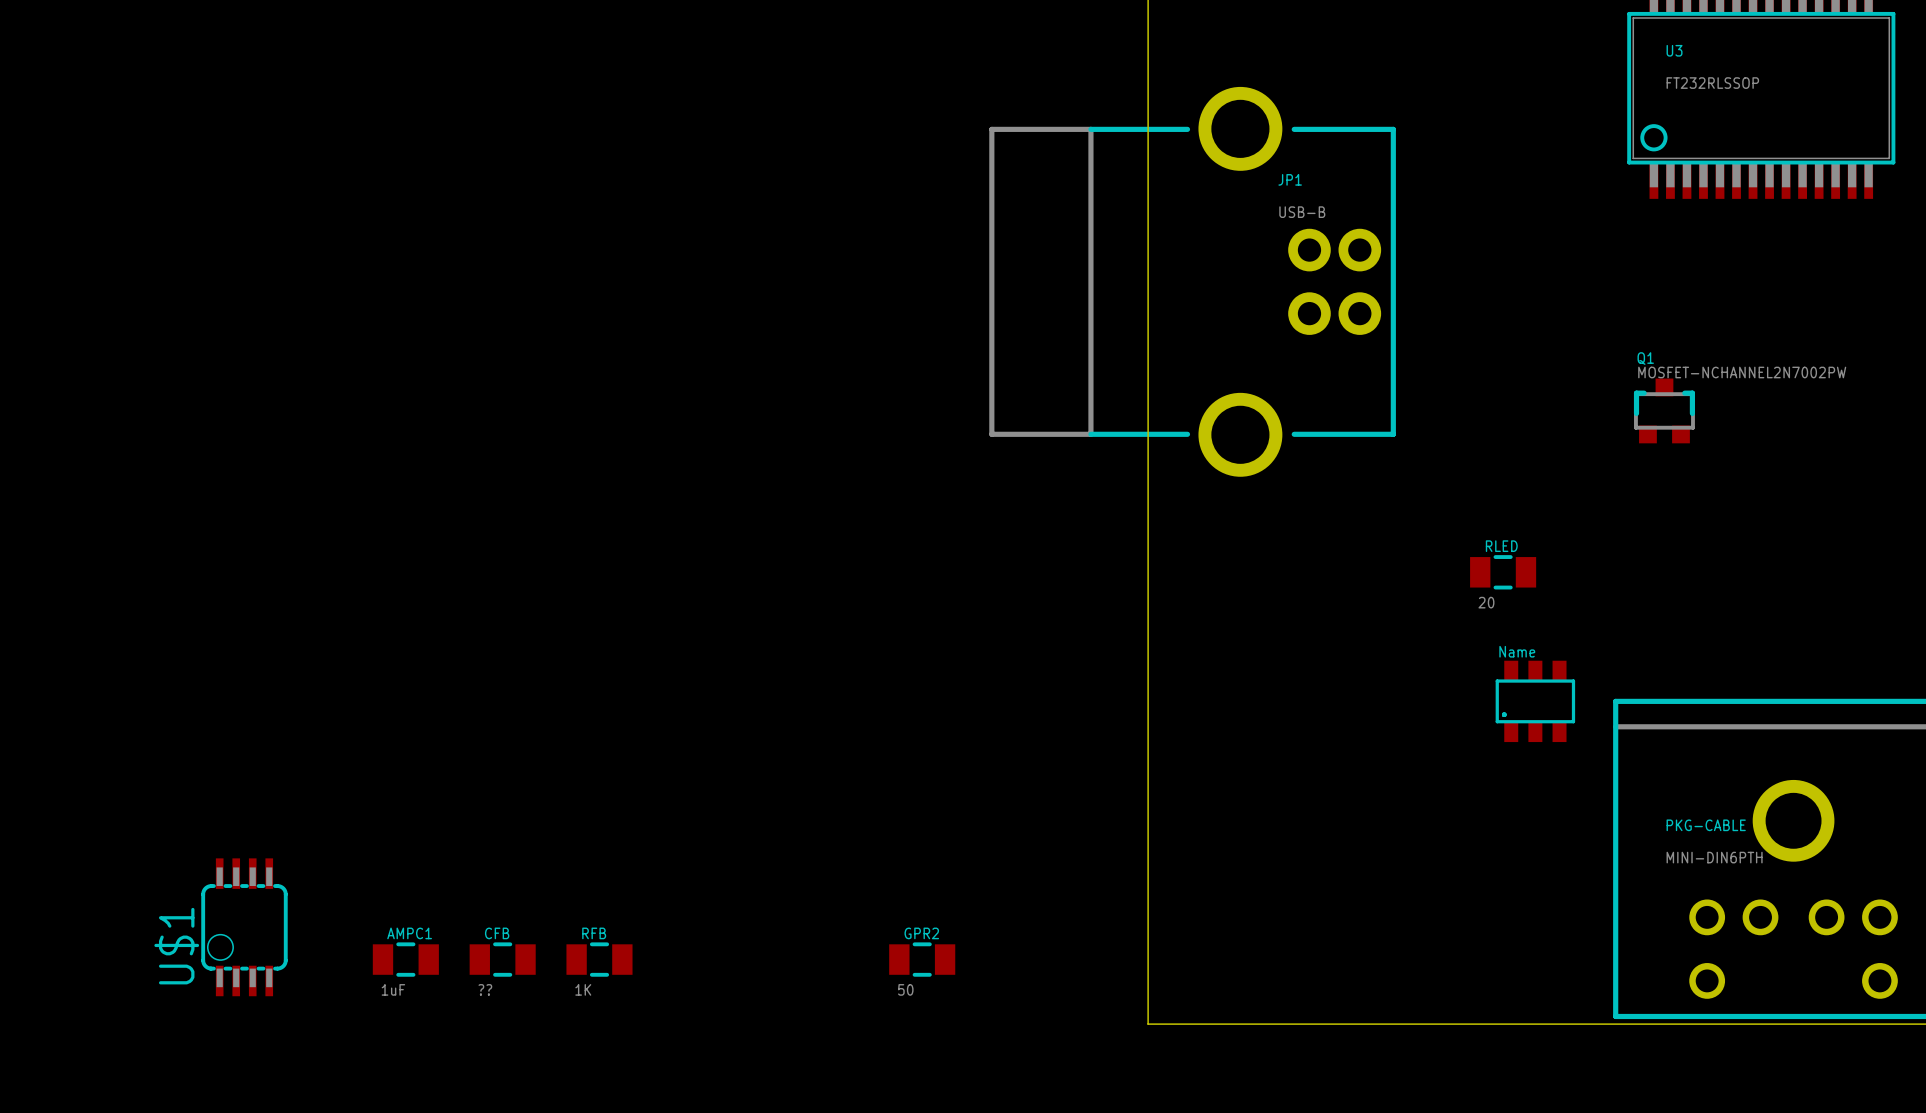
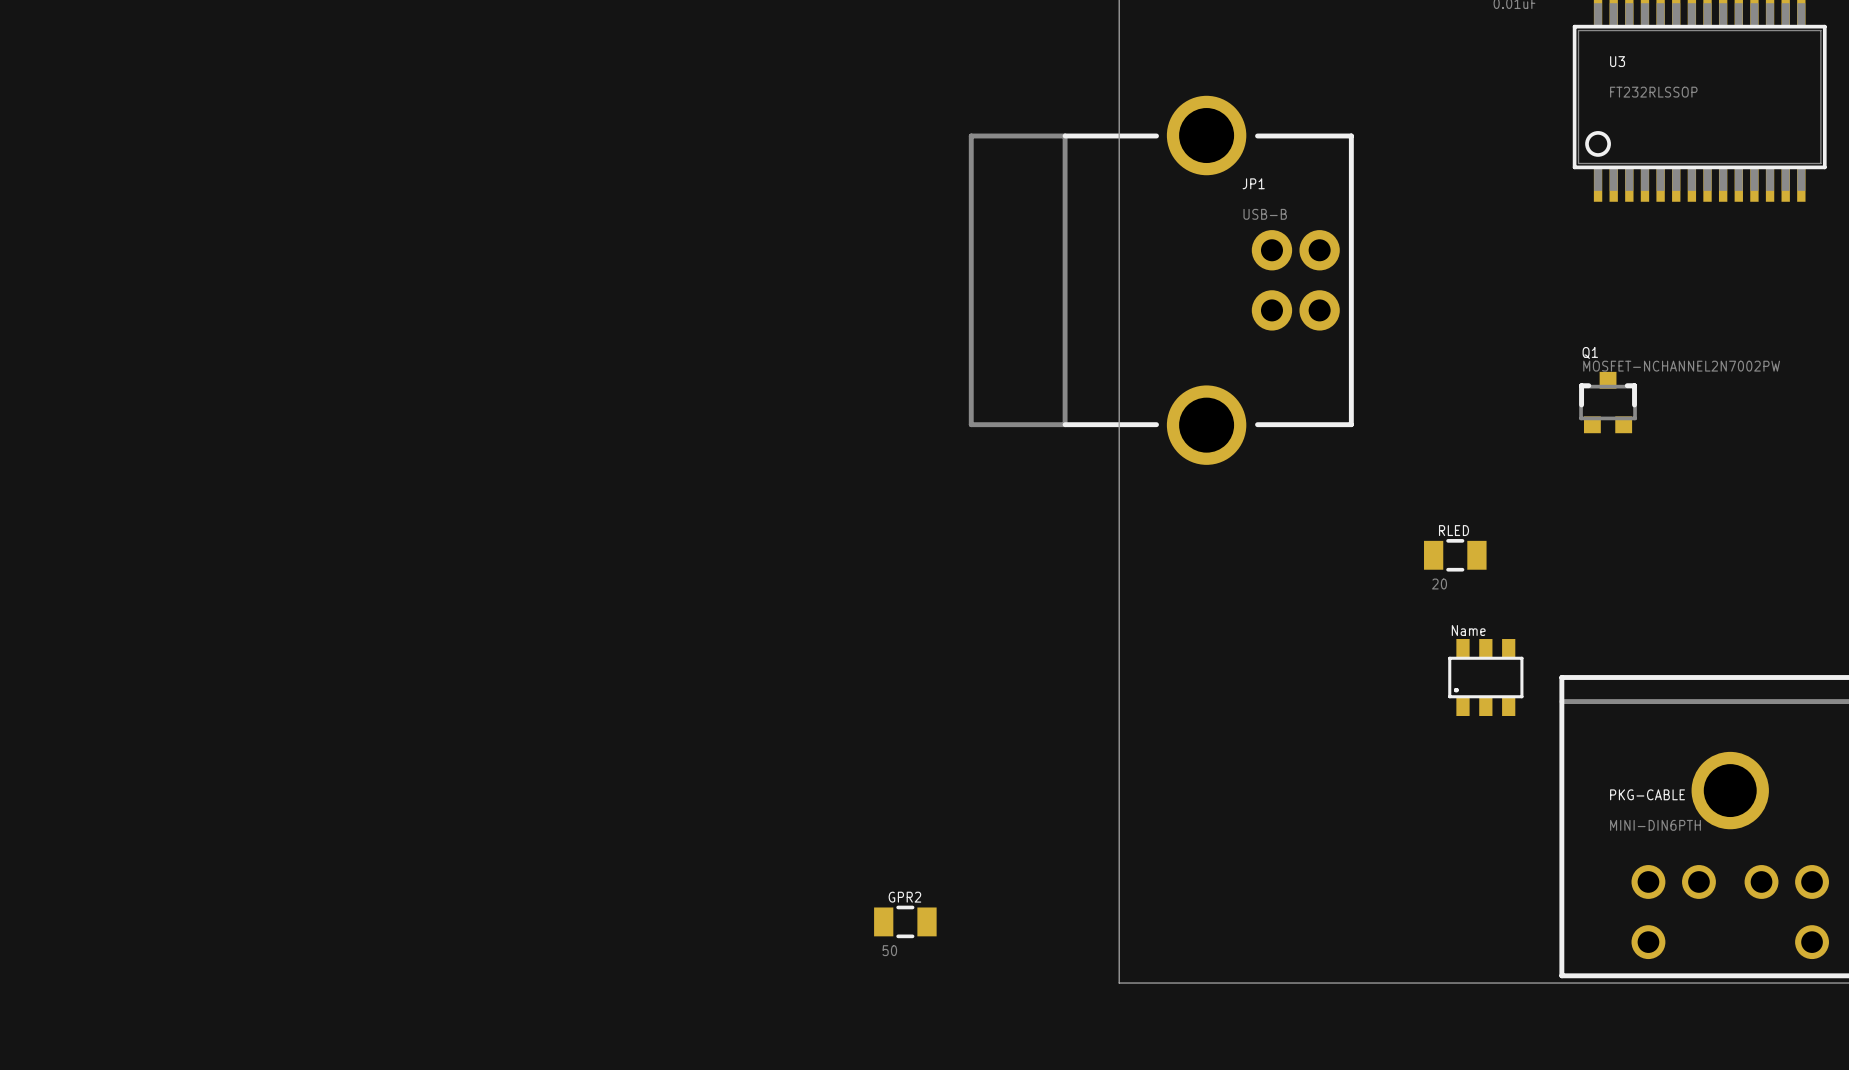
U$1: (244, 927) -> none
AMPC1: 1uF (405, 959) -> none
CFB: ?? (502, 959) -> none
RFB: 1K (599, 959) -> none

